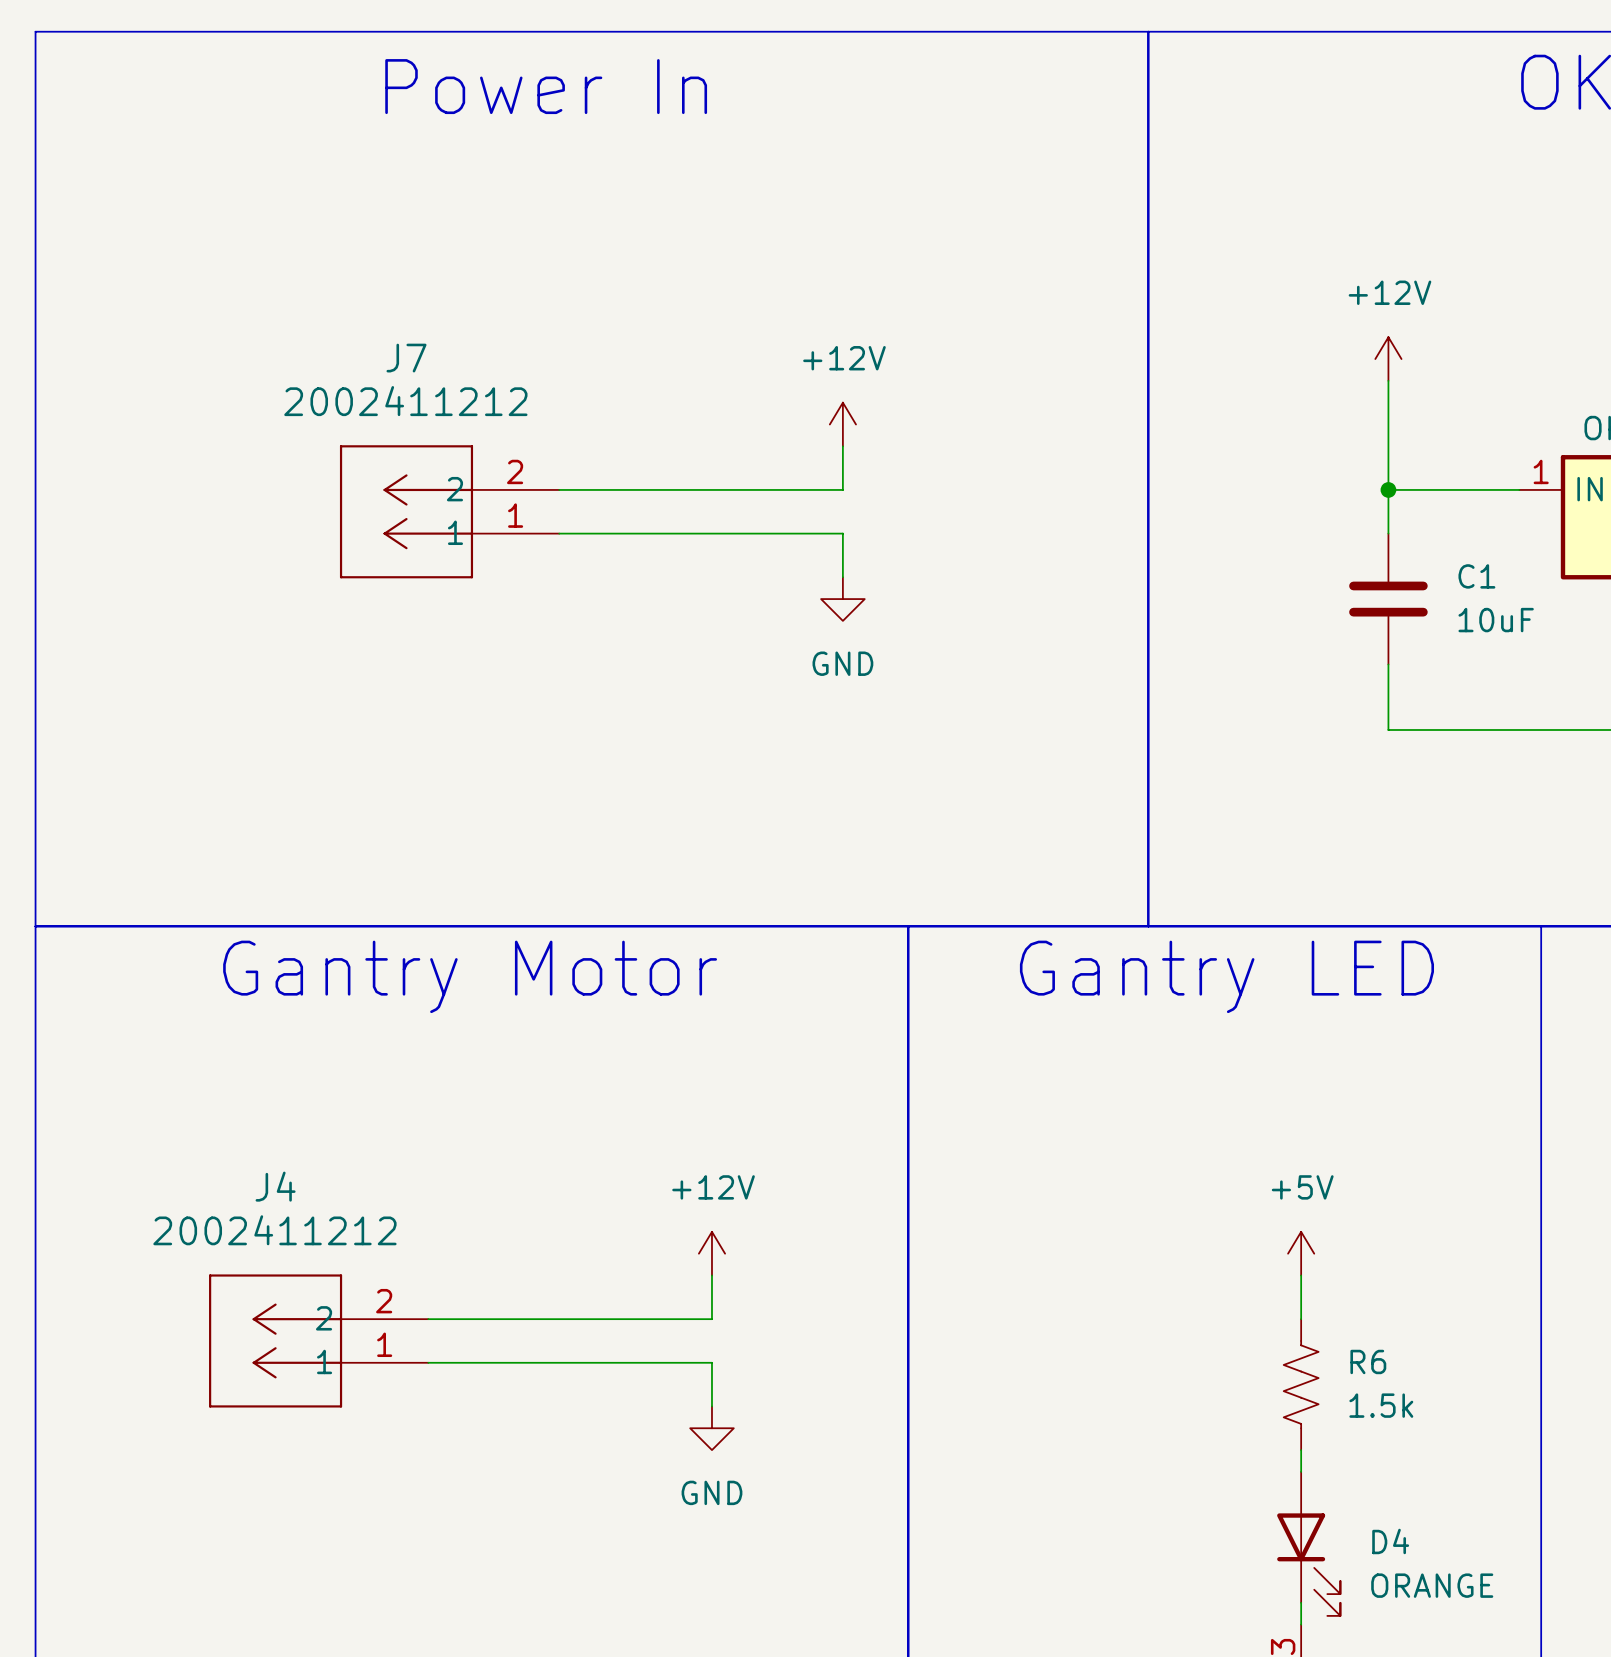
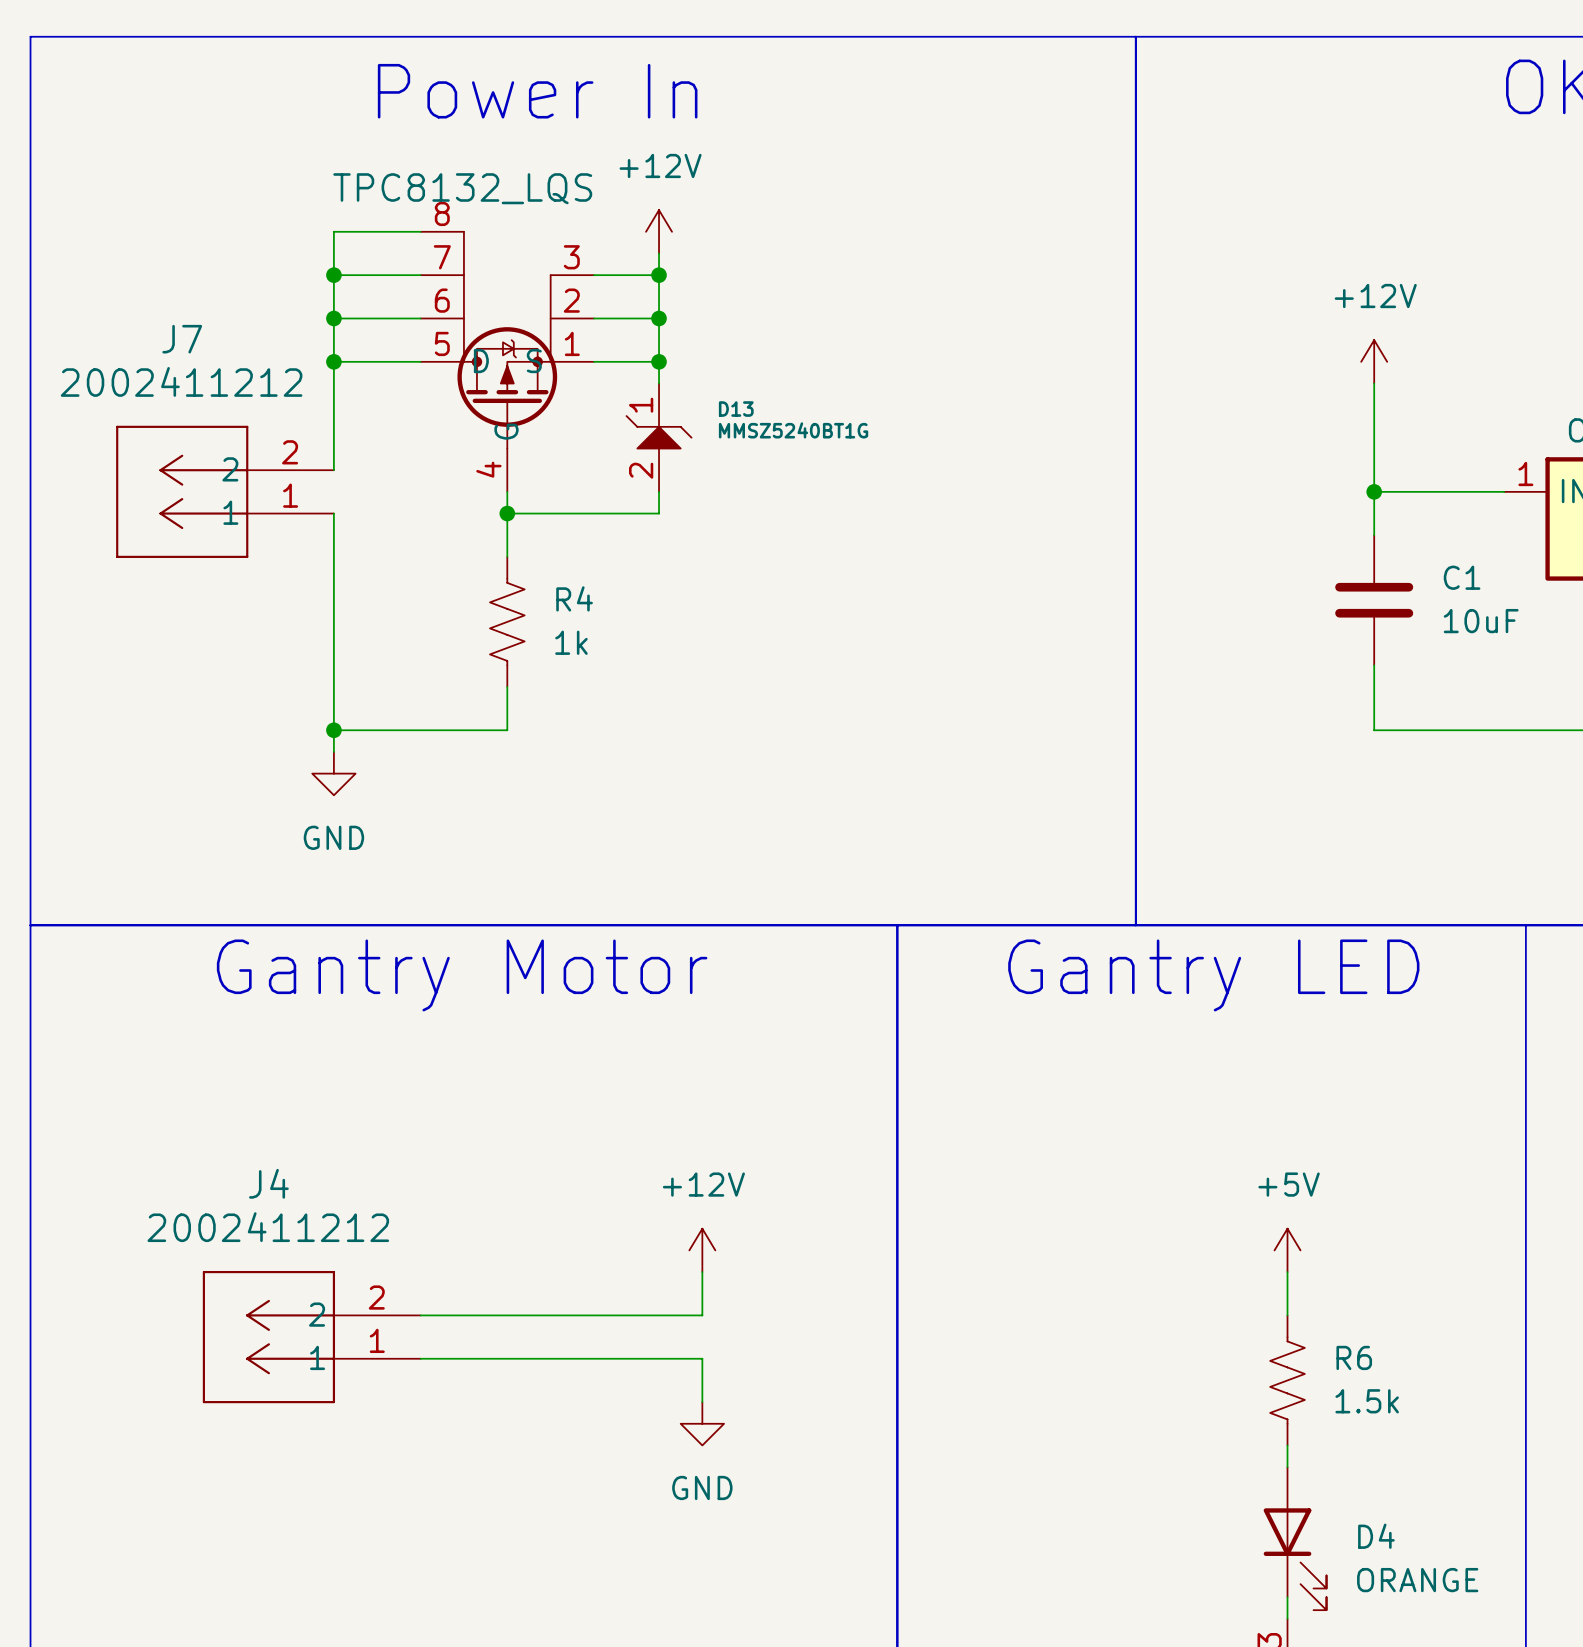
wire: none -> (420, 231) (333, 231) (333, 470)
wire: none -> (659, 253) (659, 383)
wire: none -> (333, 275) (420, 275)
junction: none -> (333, 275)
wire: none -> (594, 275) (659, 275)
junction: none -> (659, 275)
wire: none -> (333, 318) (420, 318)
junction: none -> (333, 318)
wire: none -> (594, 318) (659, 318)
junction: none -> (659, 318)
wire: none -> (333, 361) (420, 361)
junction: none -> (333, 361)
part: none -> TPC8132_LQS (507, 361)
wire: none -> (594, 361) (659, 361)
junction: none -> (659, 361)
power symbol position: +12V (842, 424) -> +12V (659, 231)
D13: none -> MMSZ5240BT1G (659, 437)
wire: (842, 446) (842, 489) (559, 489) -> none
wire: none -> (507, 491) (507, 556)
wire: none -> (659, 491) (659, 513) (507, 513)
wire: none -> (333, 513) (333, 751)
J7 position: (449, 511) -> (225, 491)
junction: none -> (507, 513)
wire: (559, 533) (842, 533) (842, 577) -> none
power symbol: GND (842, 599) -> none
R4: none -> 1k (507, 621)
wire: none -> (507, 686) (507, 730) (333, 730)
junction: none -> (333, 730)
power symbol: none -> GND (333, 773)

